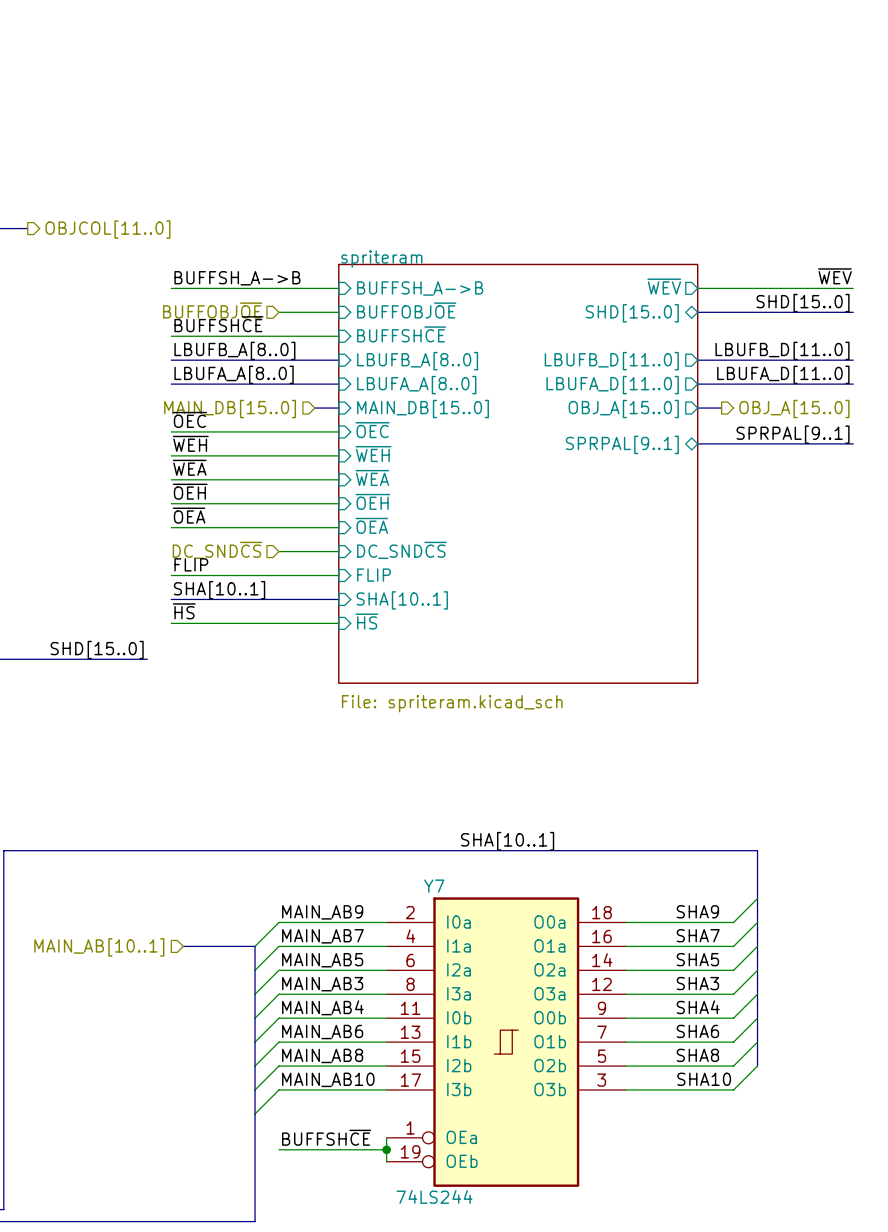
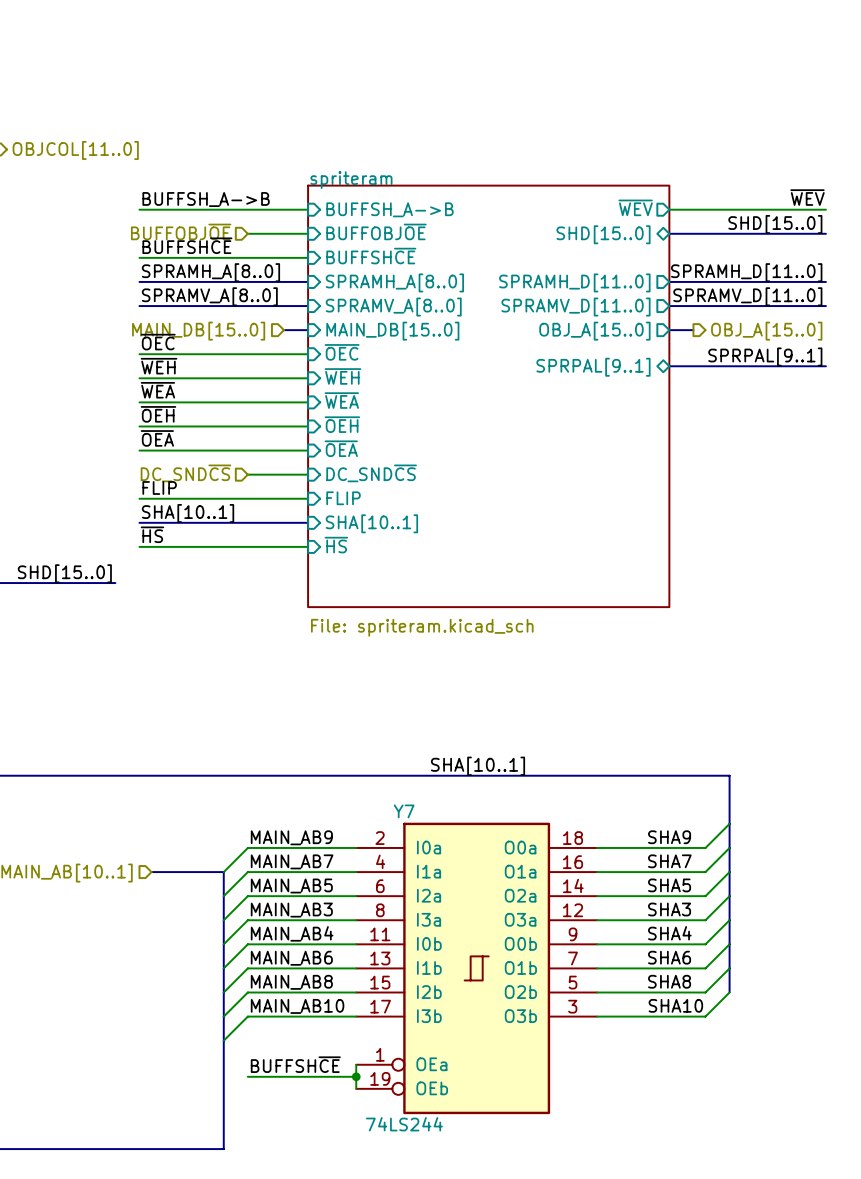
label: LBUFB_A[8..0] (234, 350) -> SPRAMH_A[8..0] (210, 272)
label: LBUFB_D[11..0] (782, 350) -> SPRAMH_D[11..0] (746, 272)
sheet pin: LBUFB_A[8..0] (417, 361) -> SPRAMH_A[8..0] (394, 282)
sheet pin: LBUFB_D[11..0] (611, 361) -> SPRAMH_D[11..0] (574, 282)
label: LBUFA_A[8..0] (234, 374) -> SPRAMV_A[8..0] (209, 296)
label: LBUFA_D[11..0] (783, 374) -> SPRAMV_D[11..0] (747, 296)
sheet pin: LBUFA_A[8..0] (416, 385) -> SPRAMV_A[8..0] (393, 307)
sheet pin: LBUFA_D[11..0] (612, 385) -> SPRAMV_D[11..0] (575, 307)

